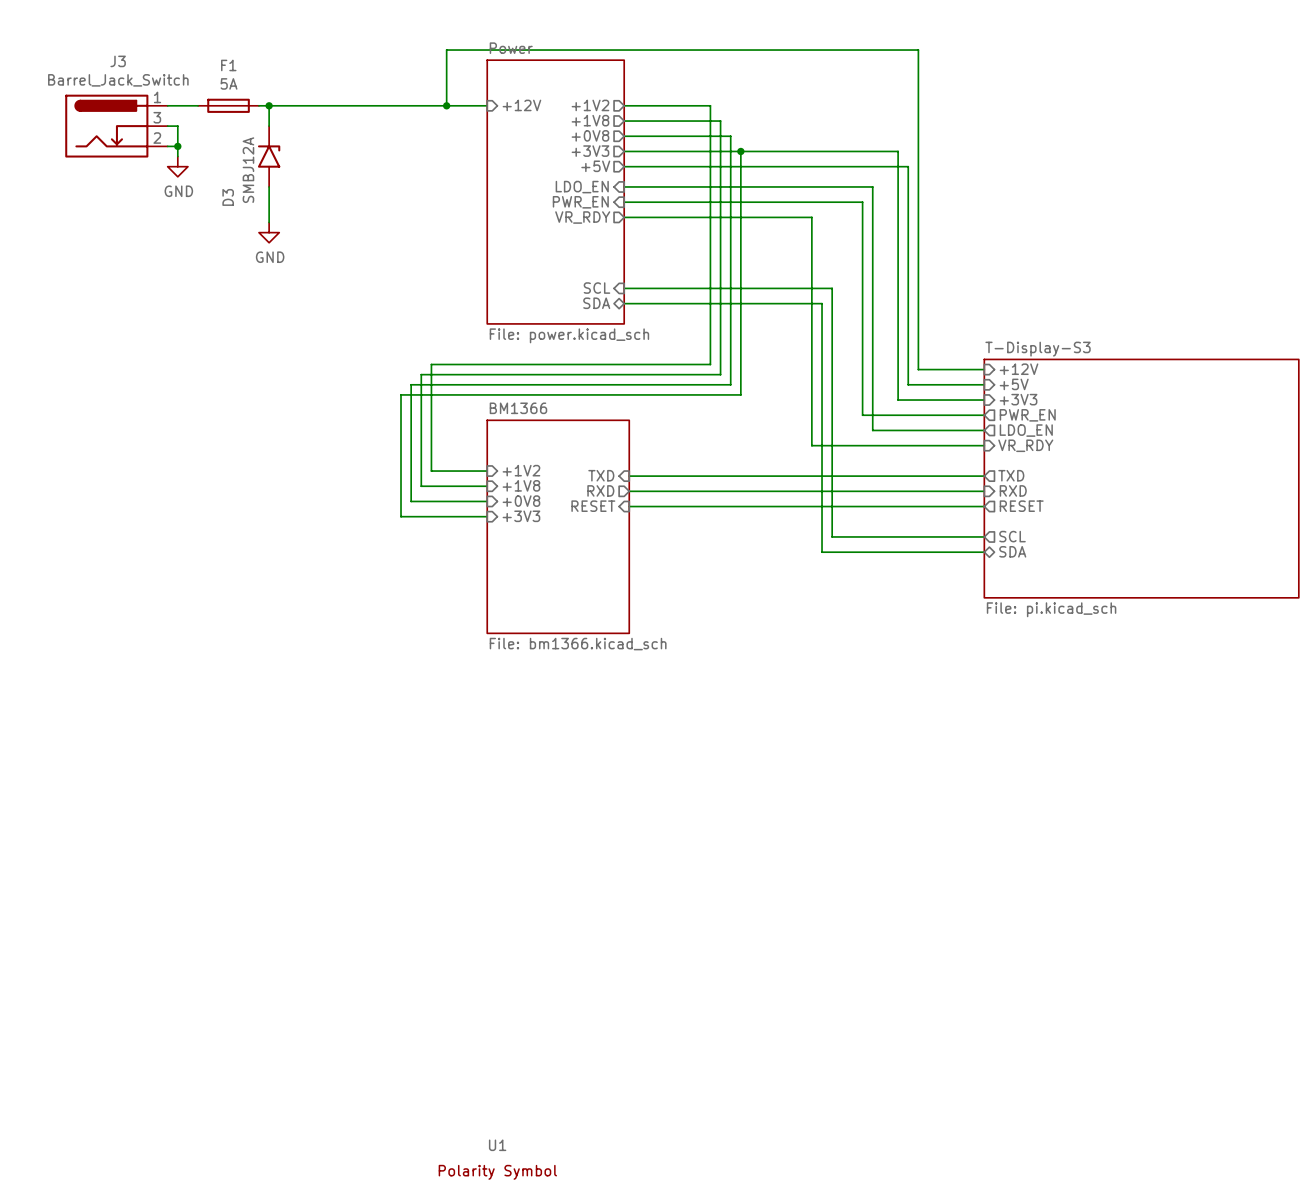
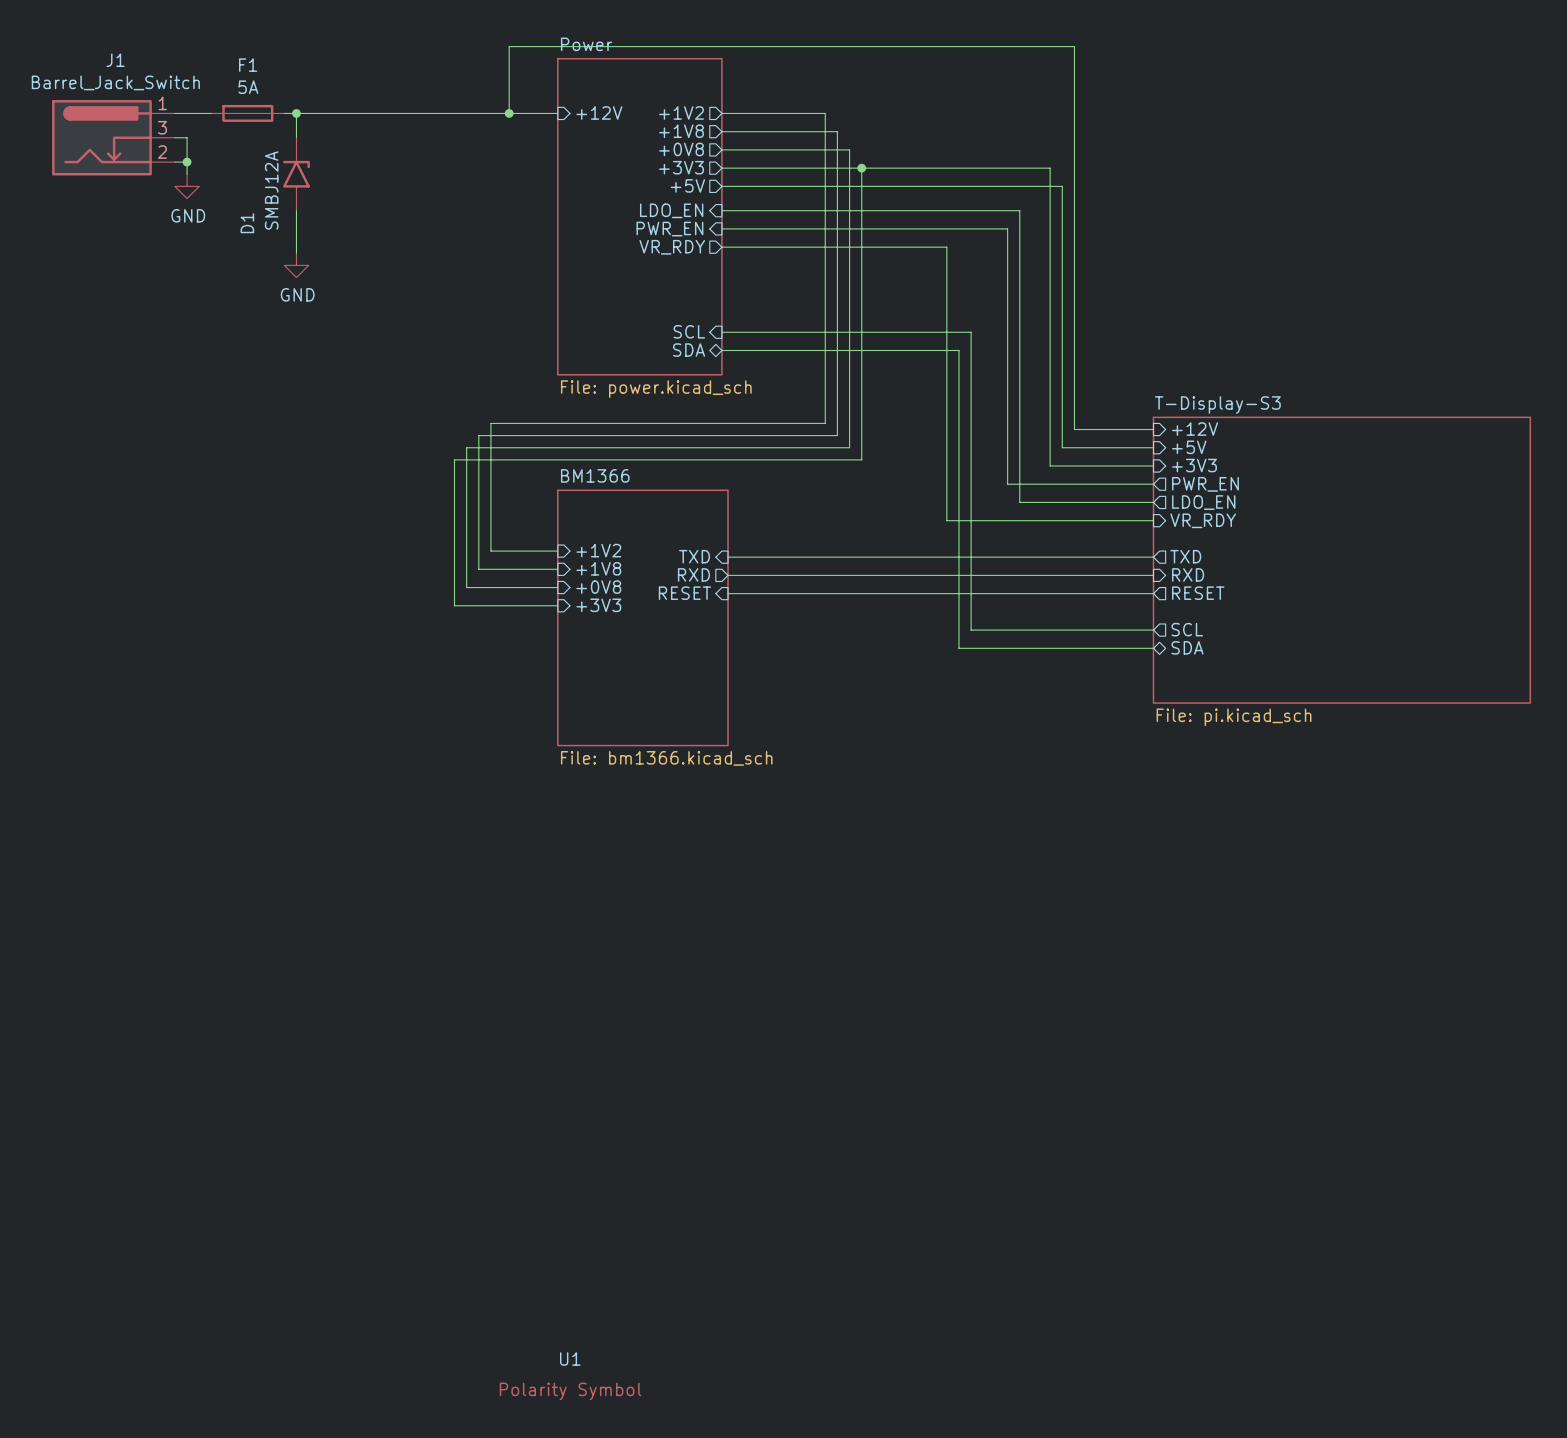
J3 name: J3 (118, 61) -> J1 (115, 60)
D3 name: D3 (228, 197) -> D1 (247, 223)

